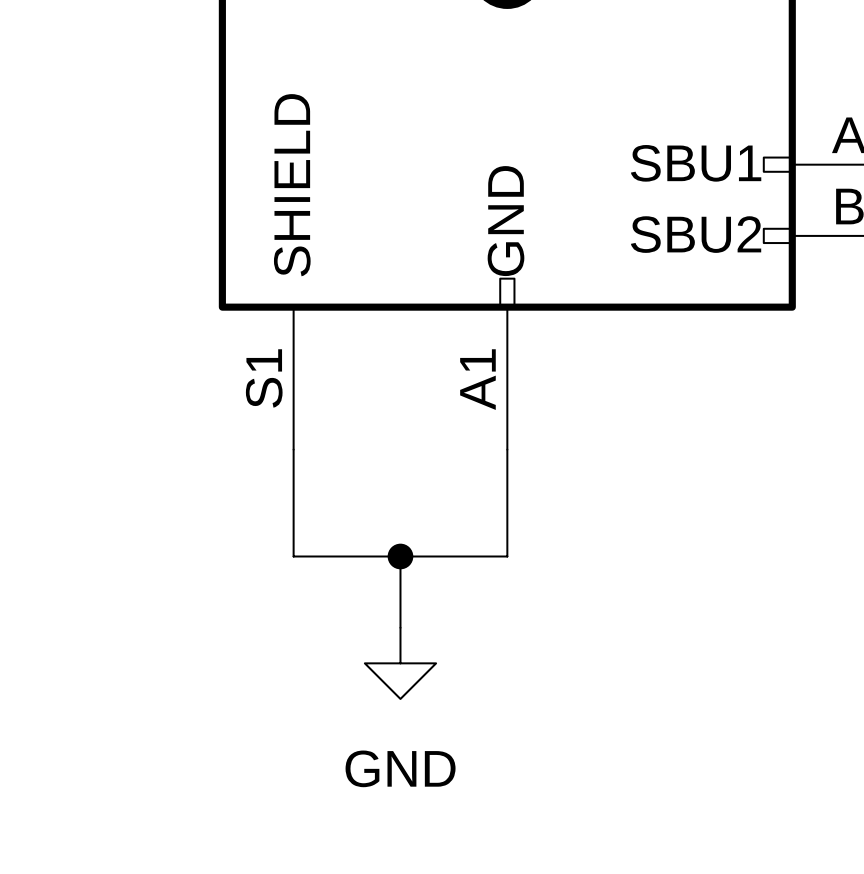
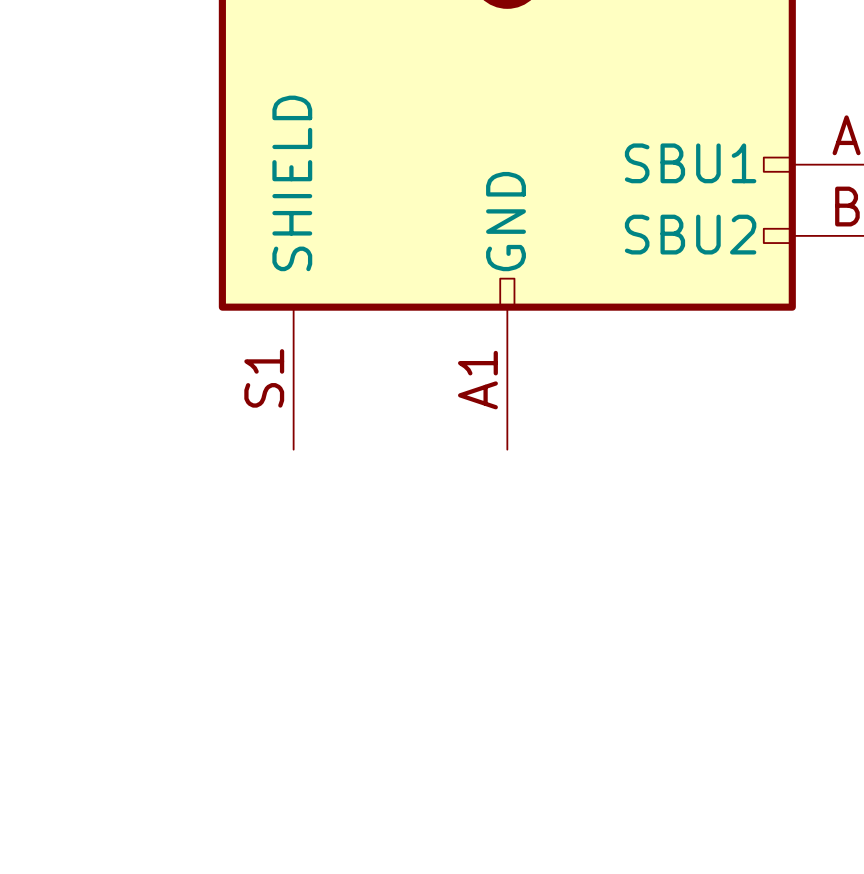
wire: (293, 449) (293, 556) (507, 556) (507, 449) -> none
wire: (400, 556) (400, 627) -> none
junction: (400, 556) -> none
power symbol: GND (400, 663) -> none

